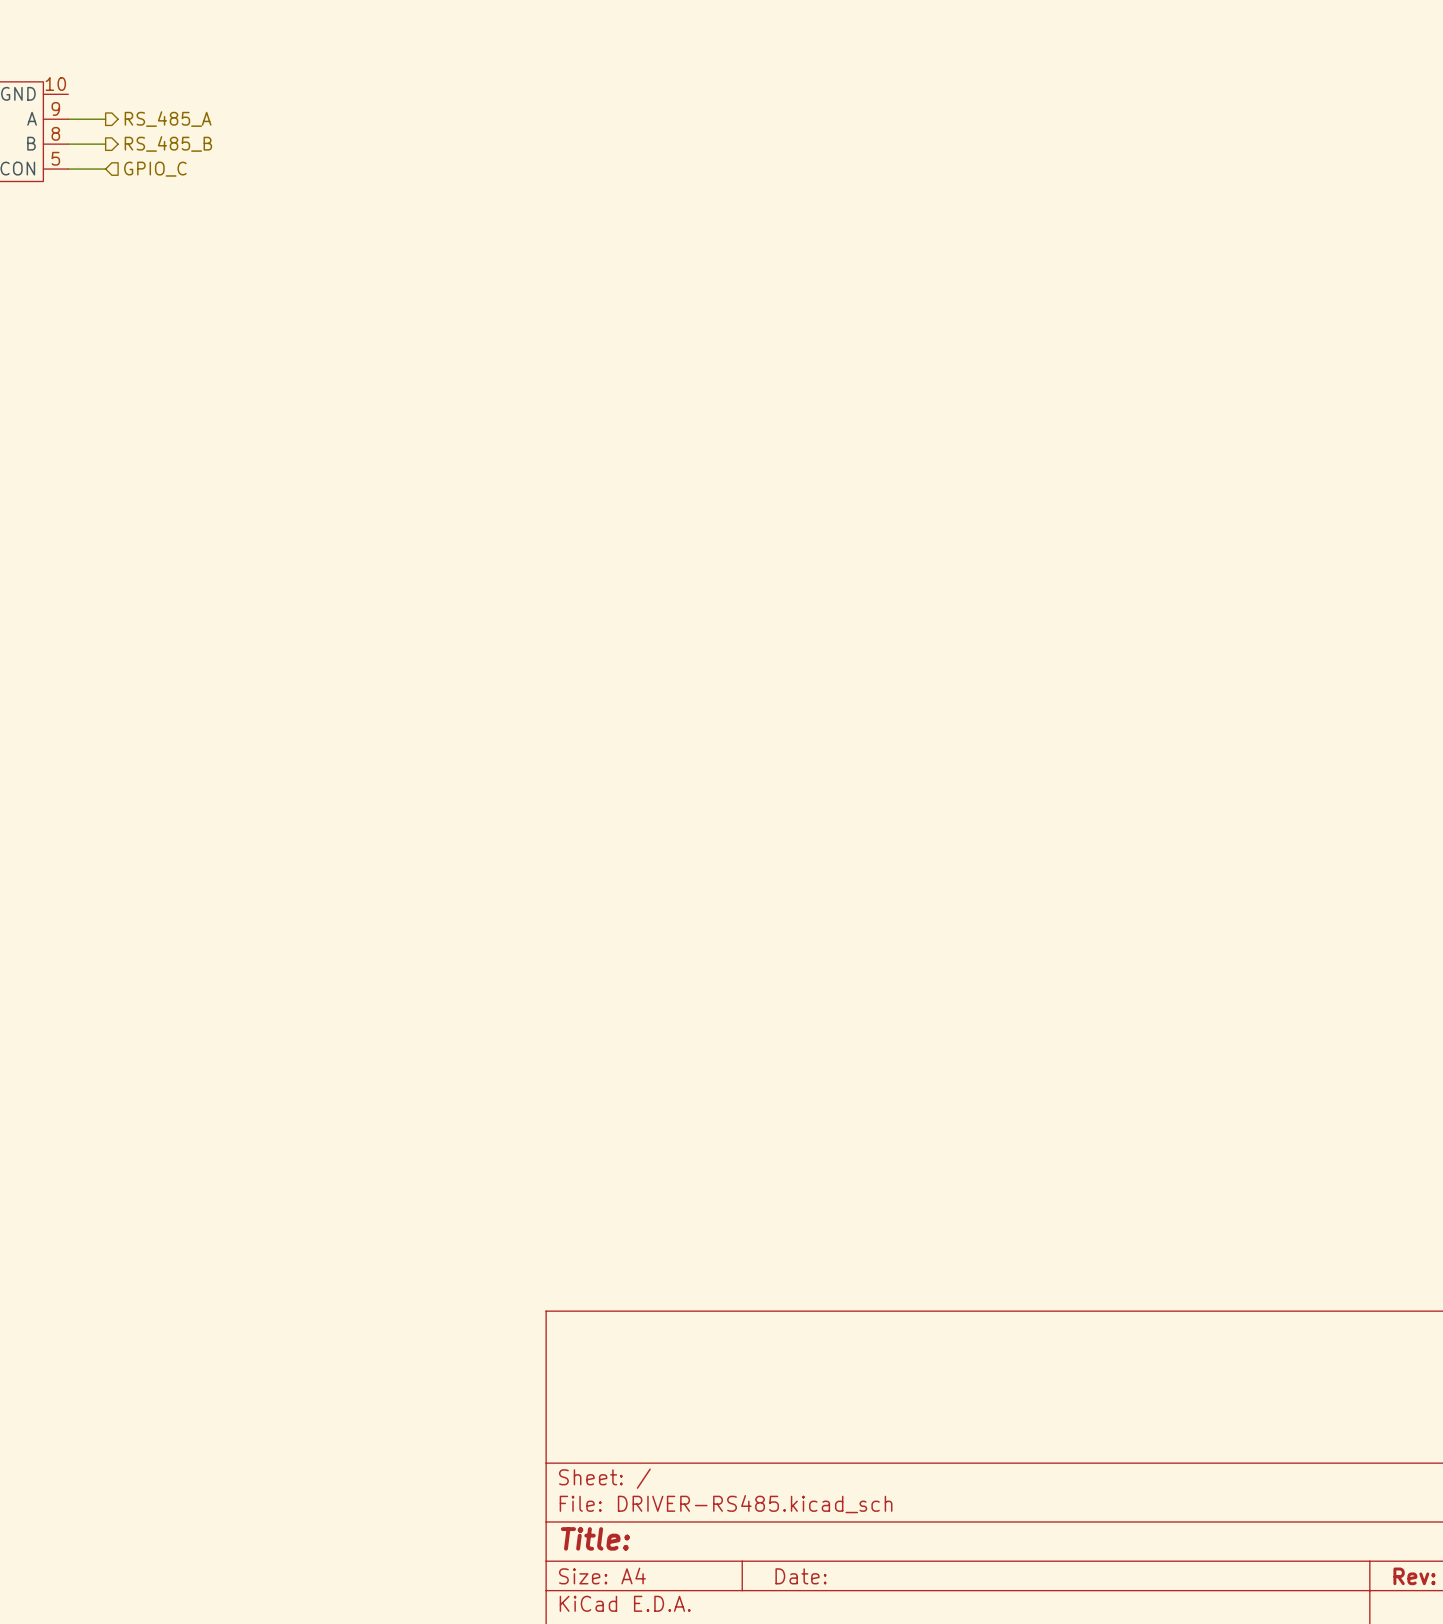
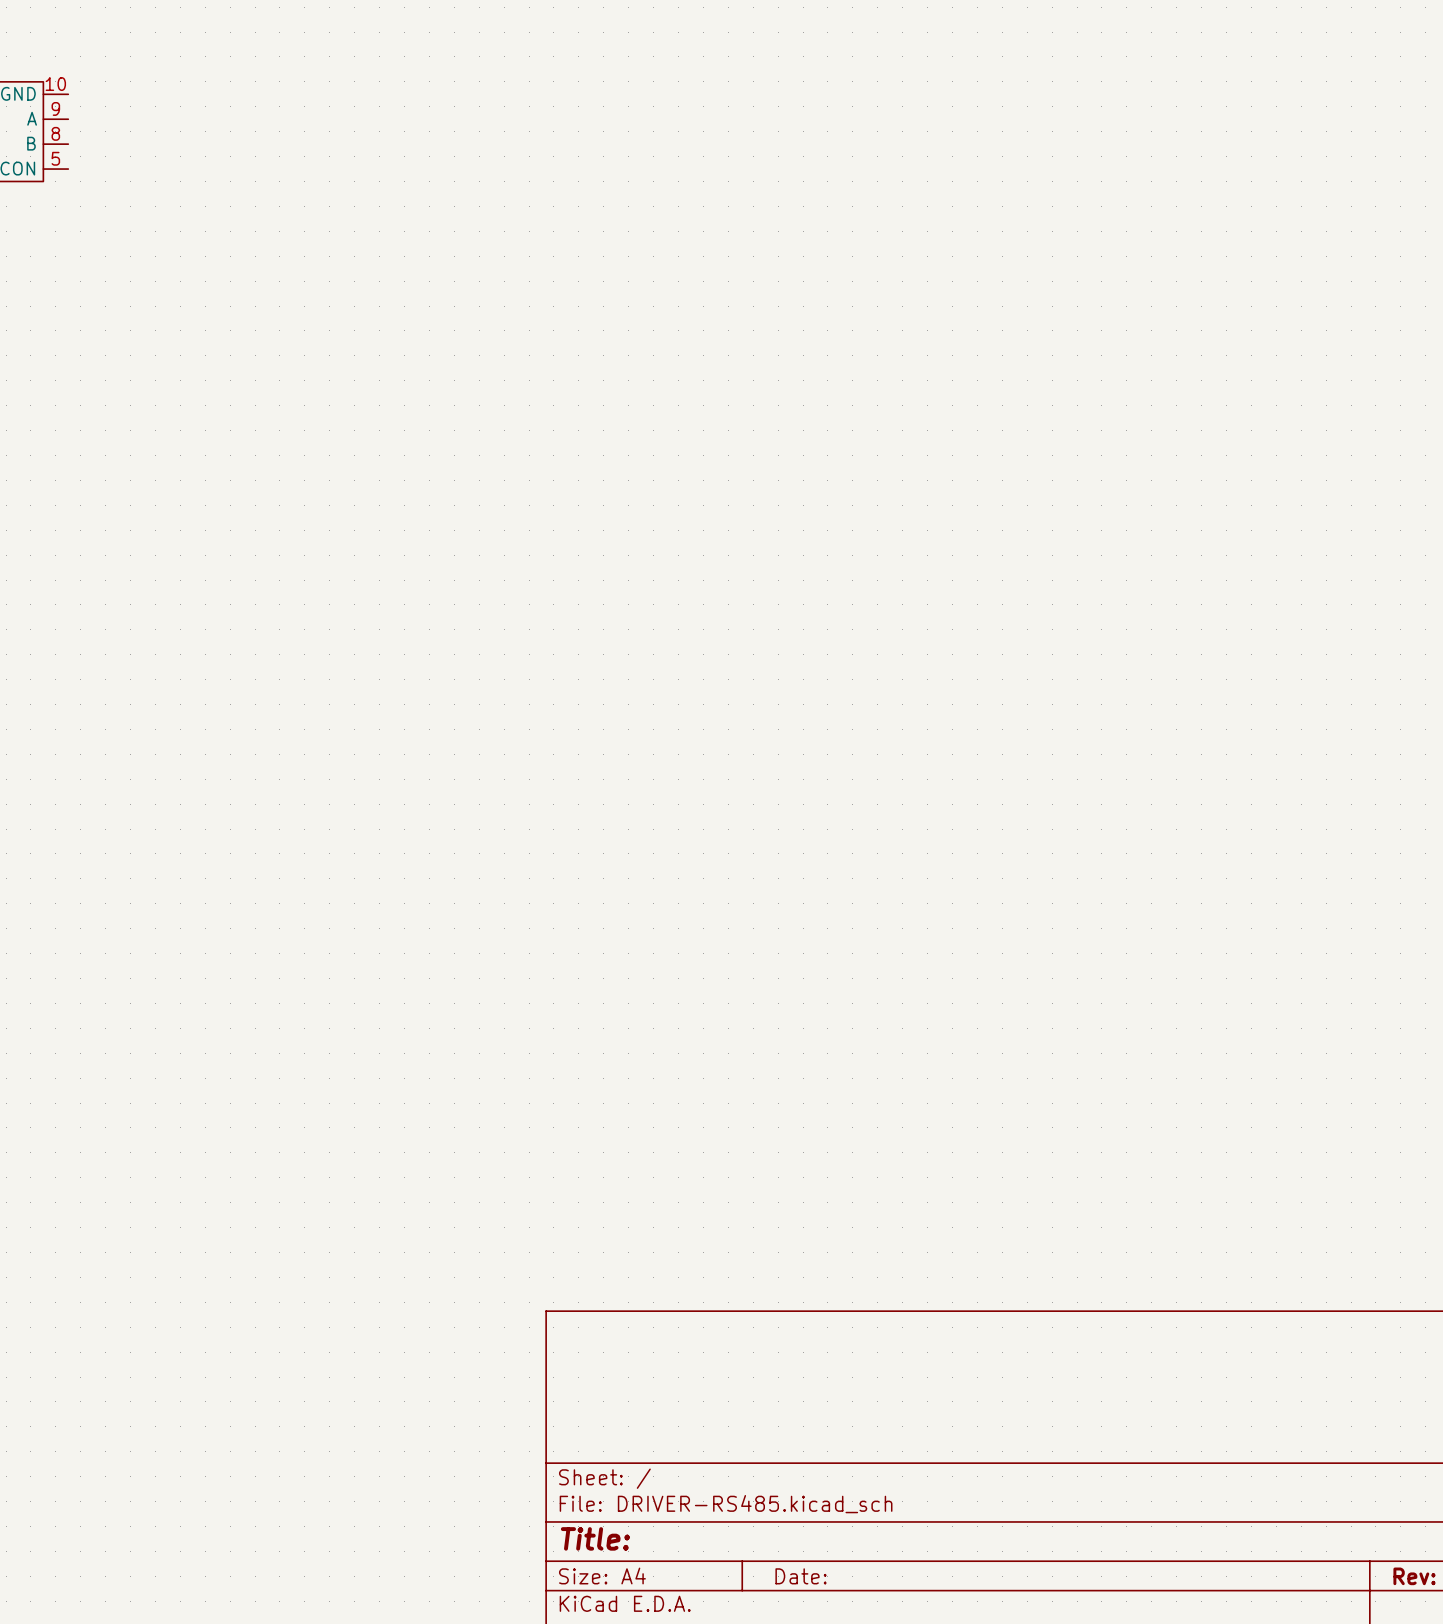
wire: (68, 119) (105, 119) -> none
hierarchical label: RS_485_A (168, 119) -> none
hierarchical label: RS_485_B (168, 143) -> none
wire: (68, 144) (105, 144) -> none
wire: (68, 169) (105, 169) -> none
hierarchical label: GPIO_C (155, 169) -> none

